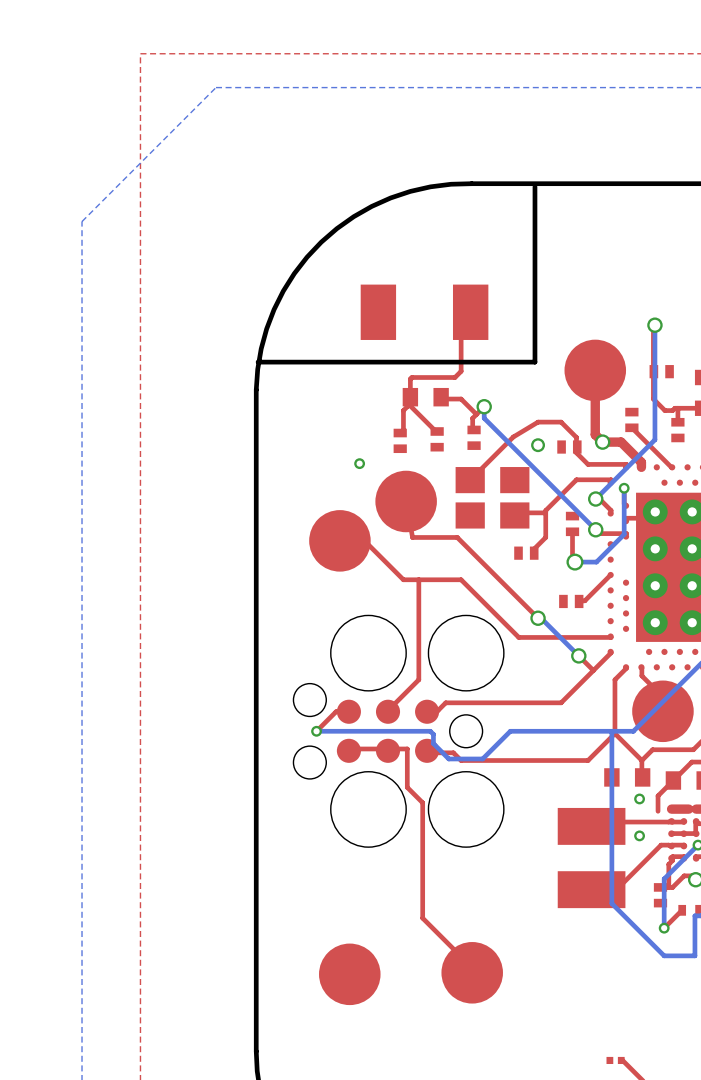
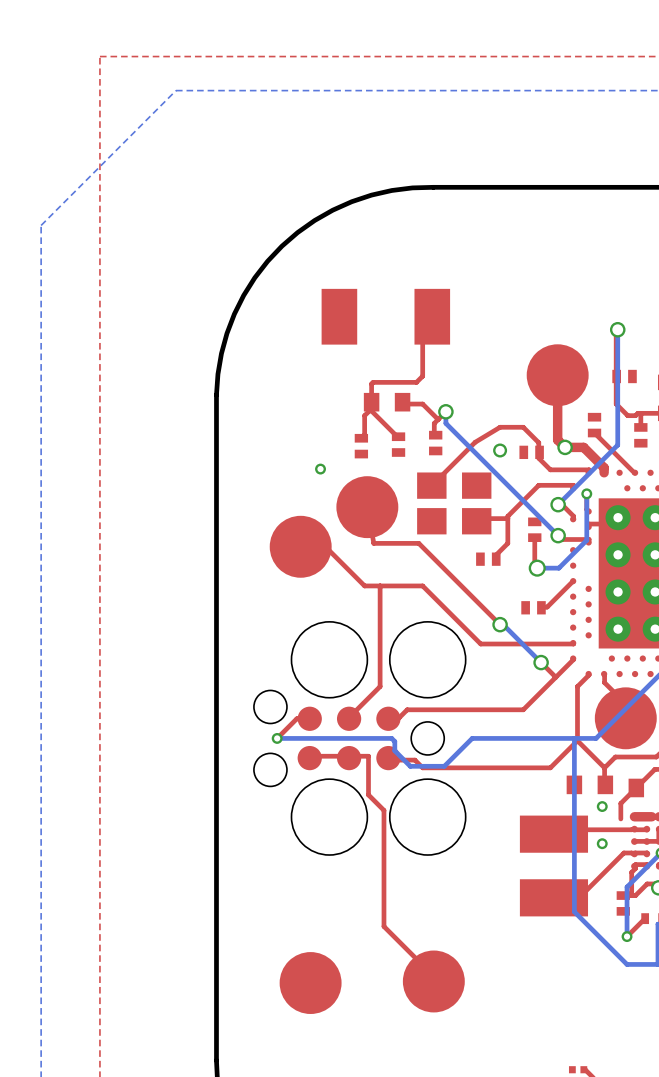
board edge: (534, 186) (534, 362) (258, 362) -> none

